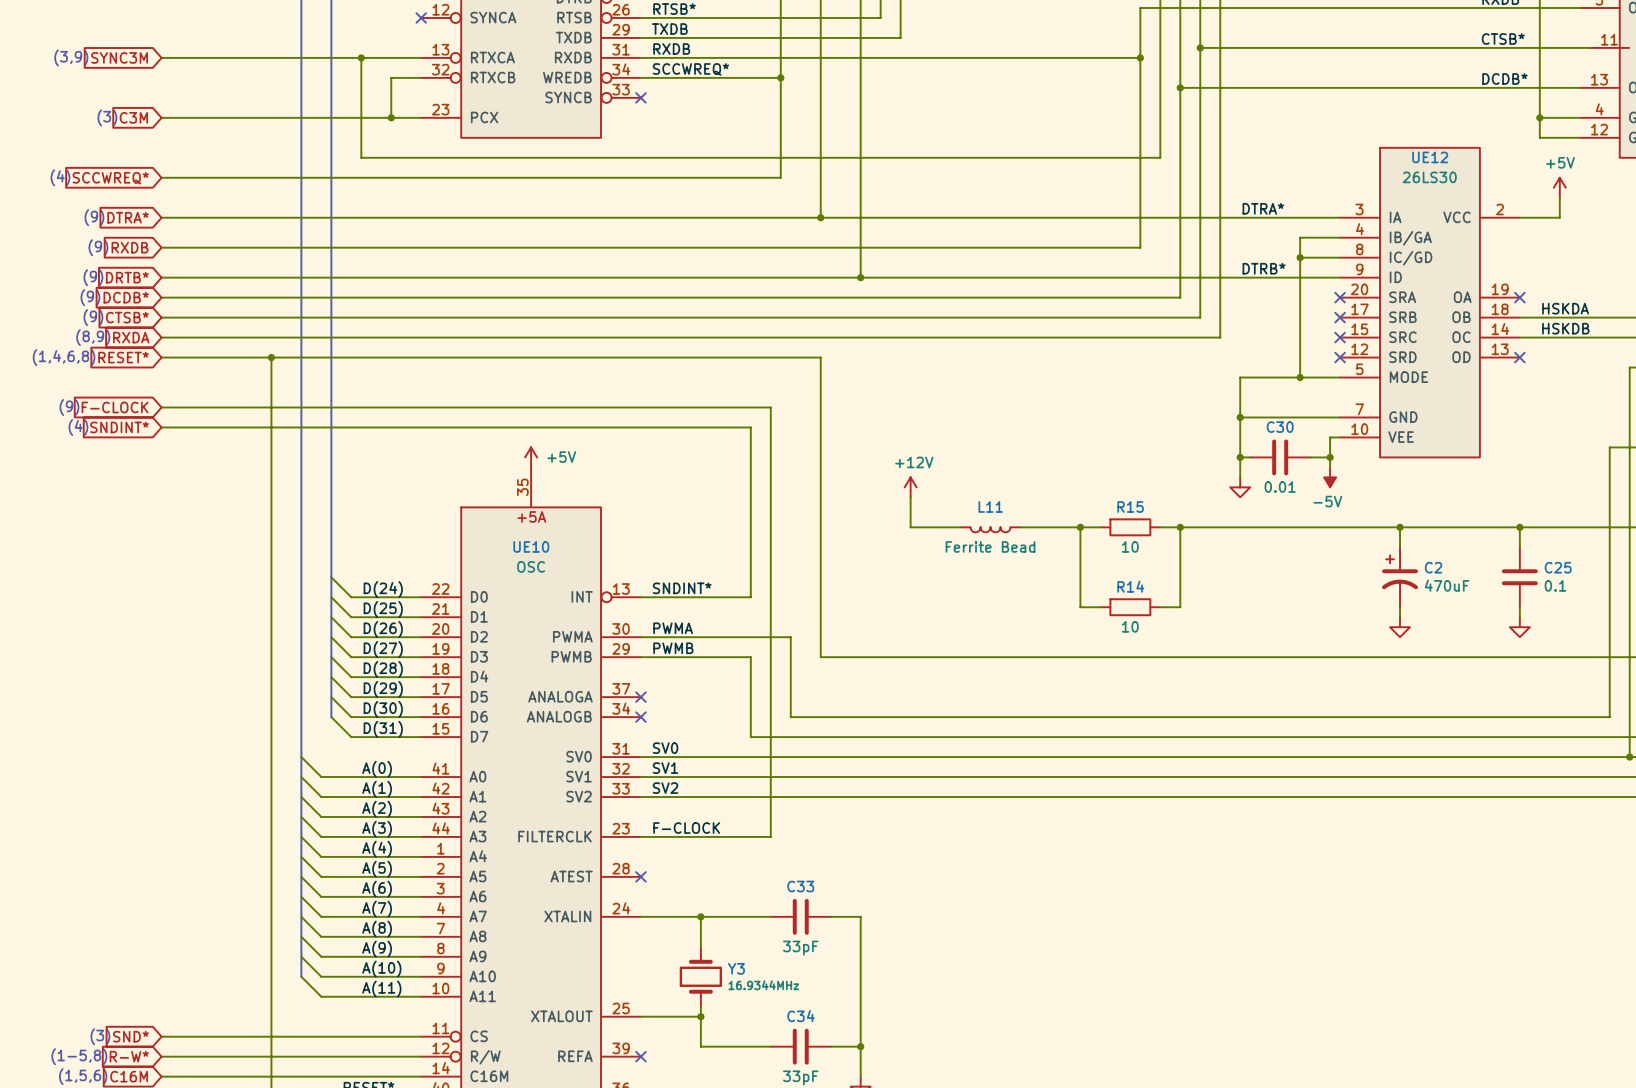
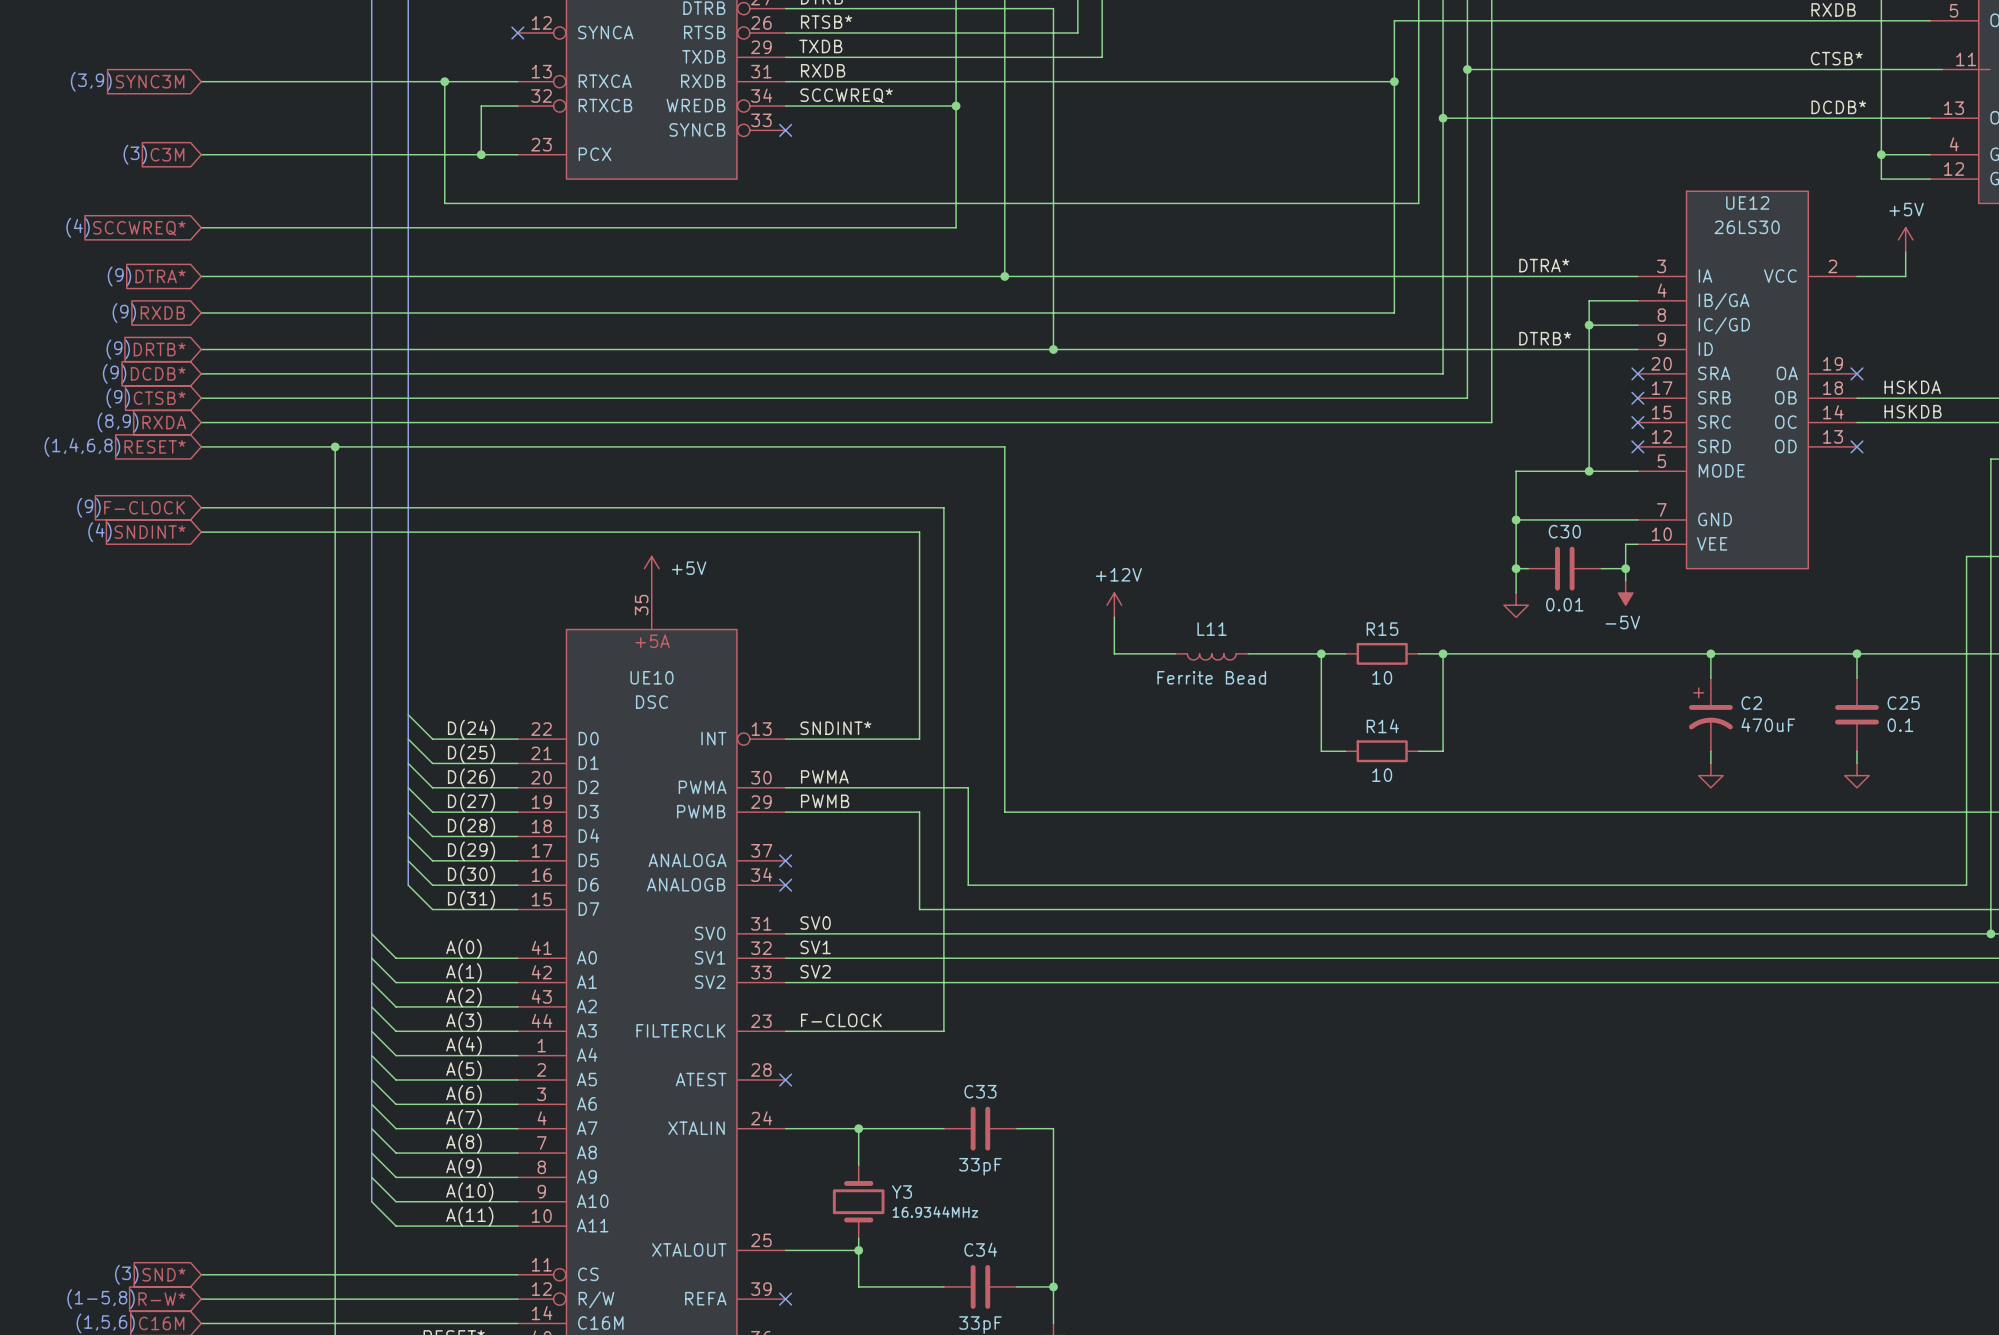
UE10 value: OSC (531, 566) -> DSC (652, 702)

